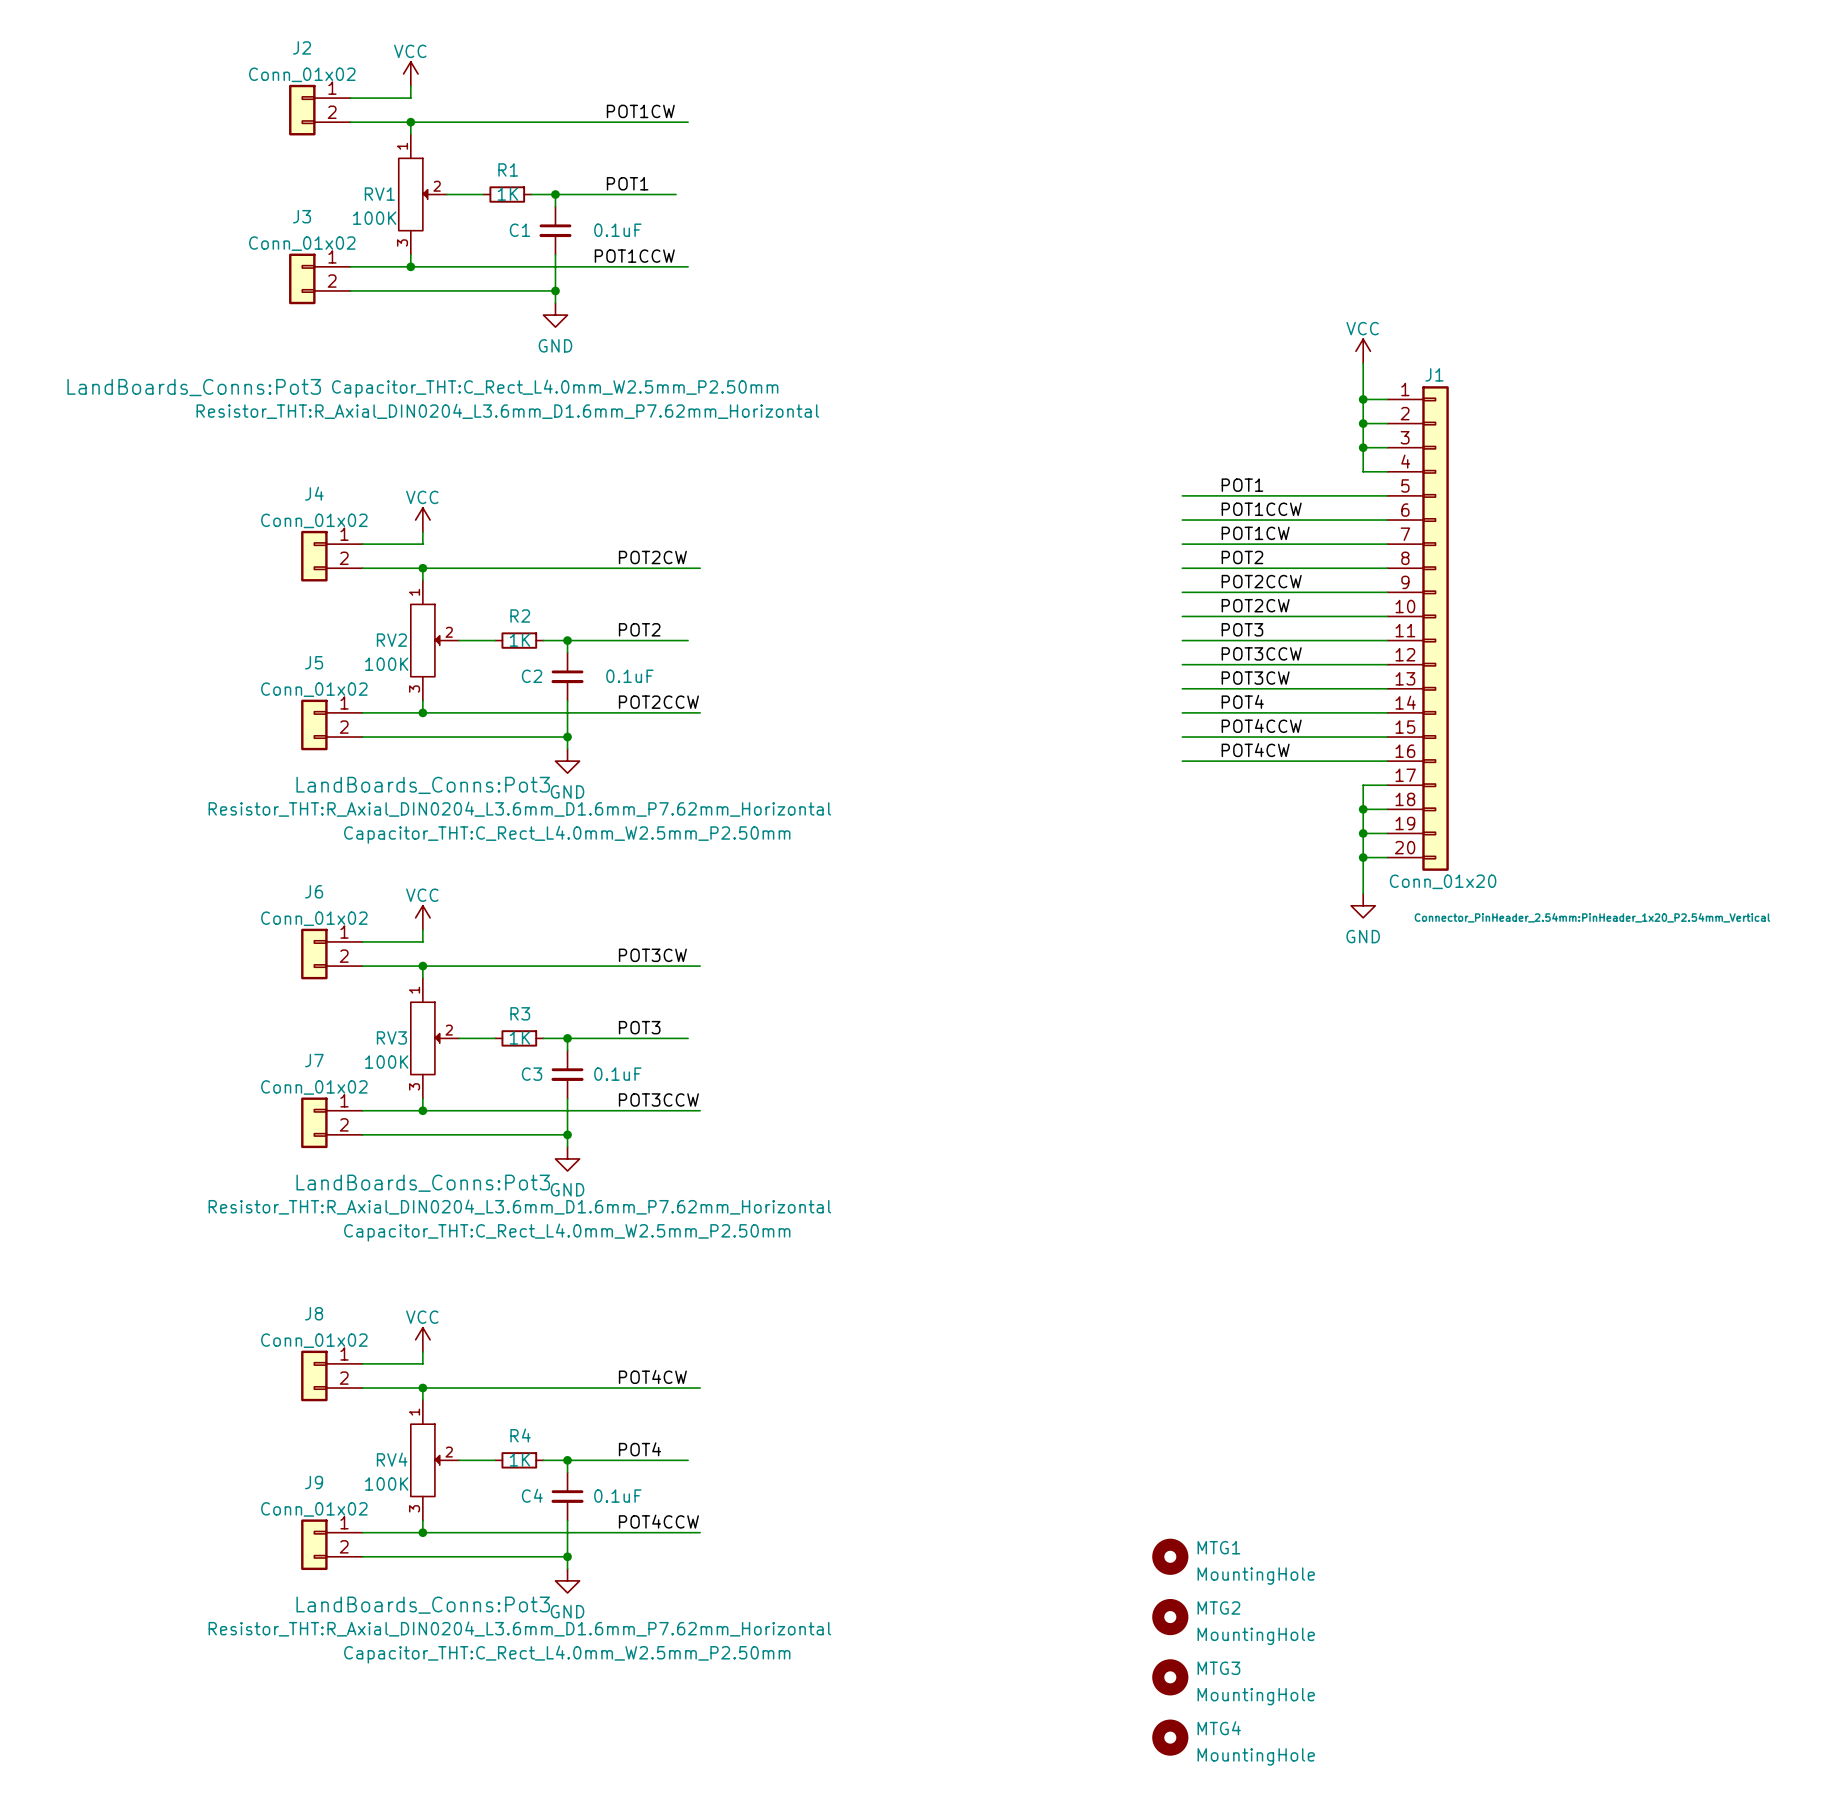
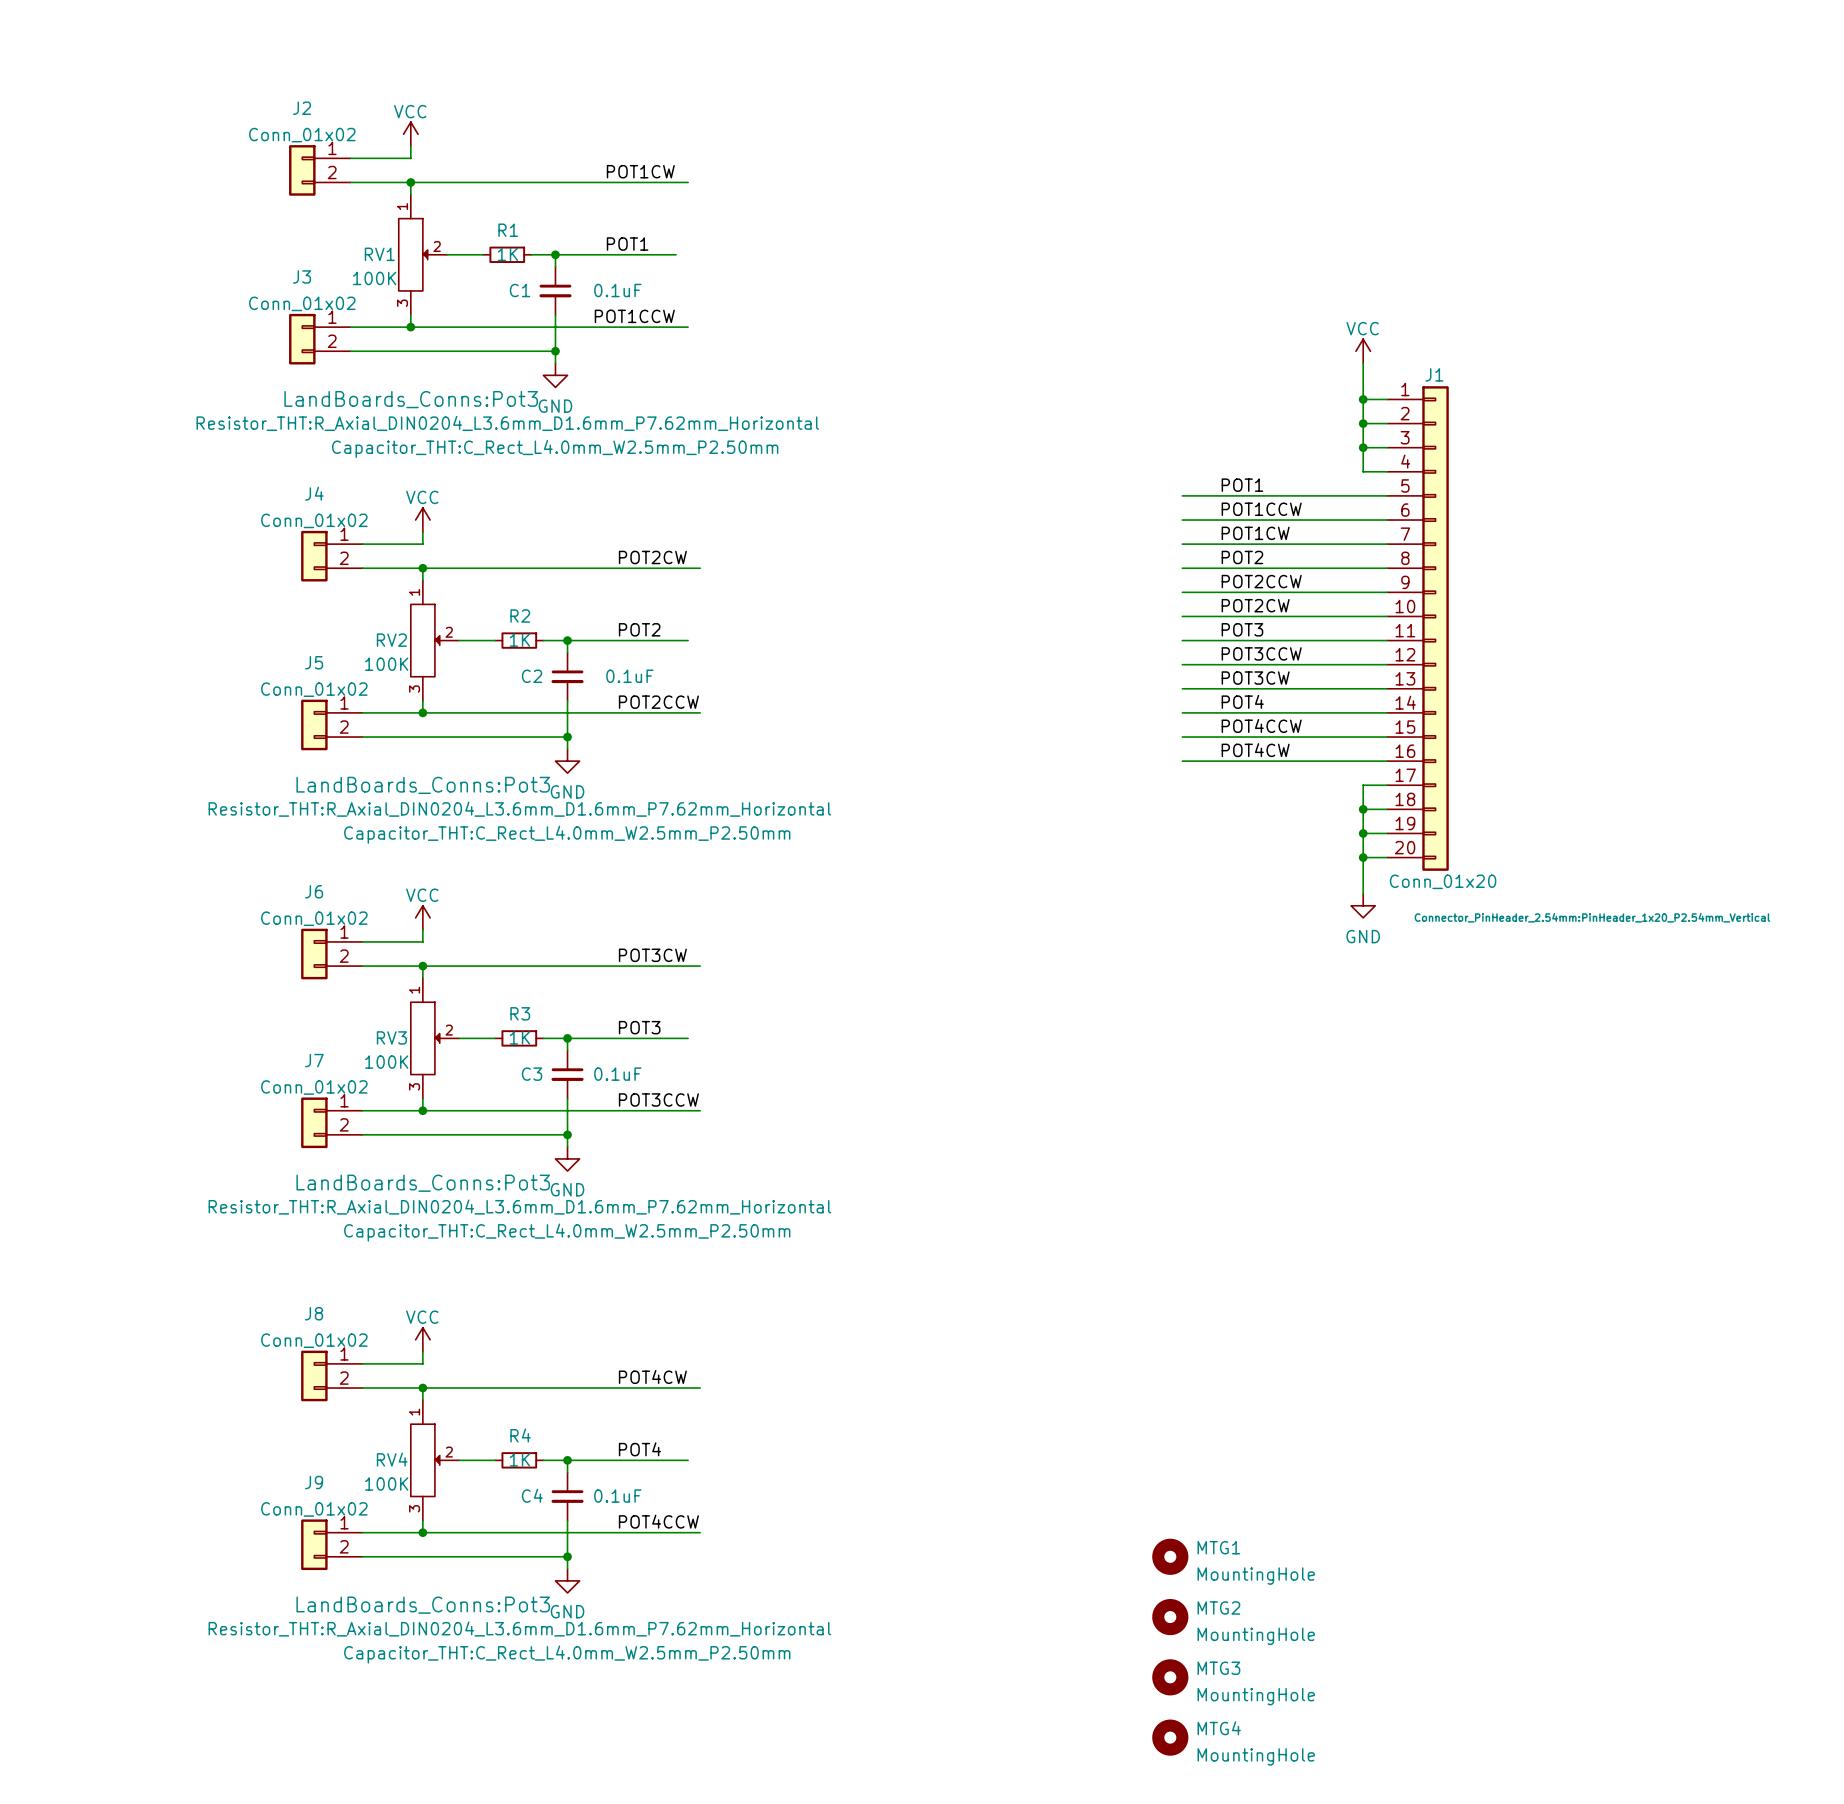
power symbol position: VCC (410, 73) -> VCC (410, 134)
wire: (410, 86) (410, 98) (350, 98) -> (410, 146) (410, 158) (350, 158)
J2 position: (319, 110) -> (319, 170)
label position: POT1CW (640, 111) -> POT1CW (640, 171)
wire: (350, 122) (688, 122) -> (350, 182) (688, 182)
junction: (410, 122) -> none
junction: none -> (410, 182)
label position: POT1 (627, 183) -> POT1 (627, 244)
RV1 position: (422, 194) -> (422, 254)
wire: (446, 194) (483, 194) -> (446, 254) (483, 254)
R1 position: (507, 194) -> (507, 254)
wire: (531, 194) (676, 194) -> (531, 254) (676, 254)
wire: (555, 194) (555, 206) -> none
junction: (555, 194) -> none
C1 position: (555, 230) -> (555, 290)
wire: (410, 254) (410, 266) -> (410, 315) (410, 327)
junction: none -> (555, 254)
label position: POT1CCW (634, 256) -> POT1CCW (634, 316)
wire: (350, 266) (688, 266) -> (350, 327) (688, 327)
junction: (410, 266) -> none
J3 position: (319, 278) -> (319, 339)
wire: (350, 290) (555, 290) -> (350, 351) (555, 351)
junction: (555, 290) -> none
wire: none -> (555, 315) (555, 363)
power symbol position: GND (555, 315) -> GND (555, 375)
junction: none -> (410, 327)
junction: none -> (555, 351)
RV1 text position: LandBoards_Conns:Pot3 (194, 387) -> LandBoards_Conns:Pot3 (411, 399)
R1 text position: Resistor_THT:R_Axial_DIN0204_L3.6mm_D1.6mm_P7.62mm_Horizontal (507, 411) -> Resistor_THT:R_Axial_DIN0204_L3.6mm_D1.6mm_P7.62mm_Horizontal (507, 423)

